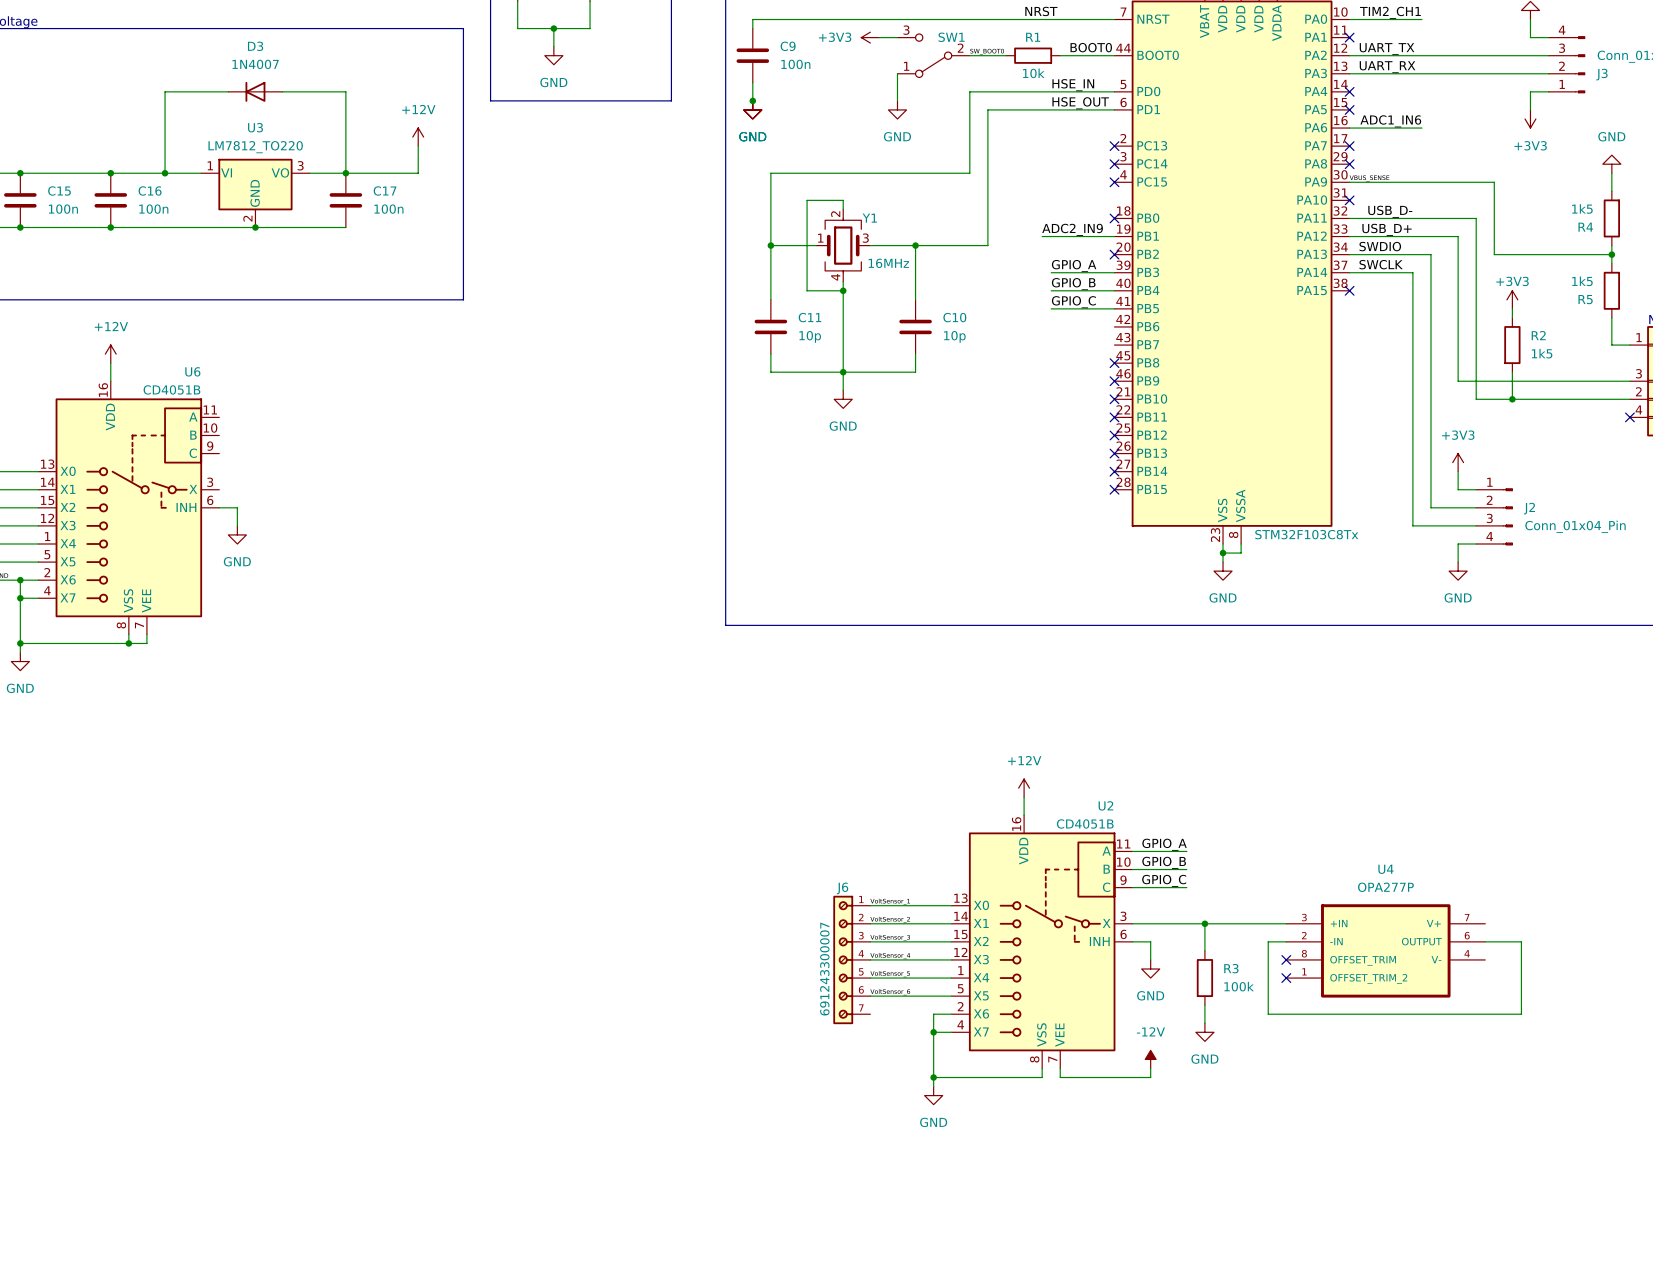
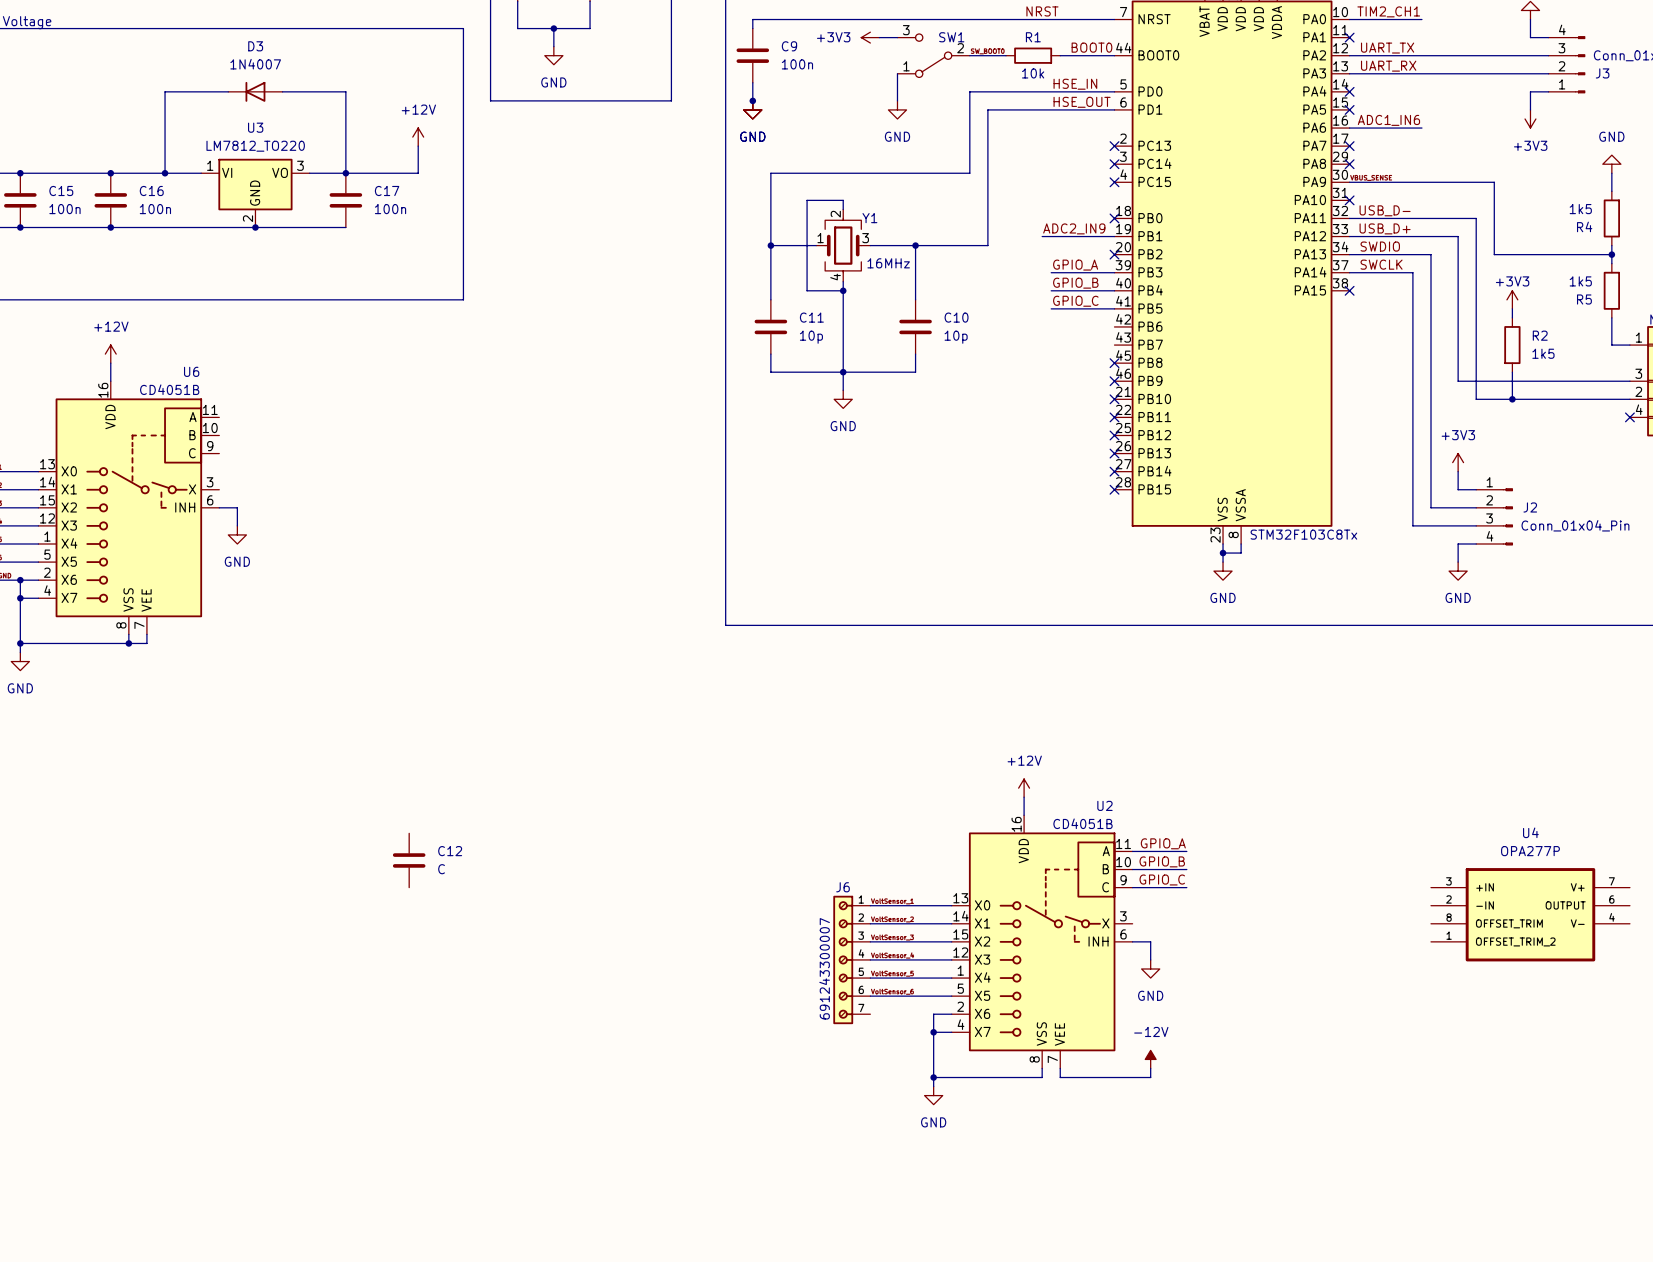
C12: none -> C (409, 860)
wire: (1132, 923) (1286, 923) -> none
wire: (1204, 923) (1204, 950) -> none
junction: (1204, 923) -> none
wire: (1286, 941) (1268, 941) (1268, 1014) (1521, 1014) (1521, 941) (1485, 941) -> none
U4 position: (1385, 950) -> (1530, 914)
no-connect mark: (1286, 959) -> none
R3: 100k (1204, 978) -> none
no-connect mark: (1286, 978) -> none
wire: (1204, 1005) (1204, 1023) -> none
power symbol: GND (1204, 1032) -> none

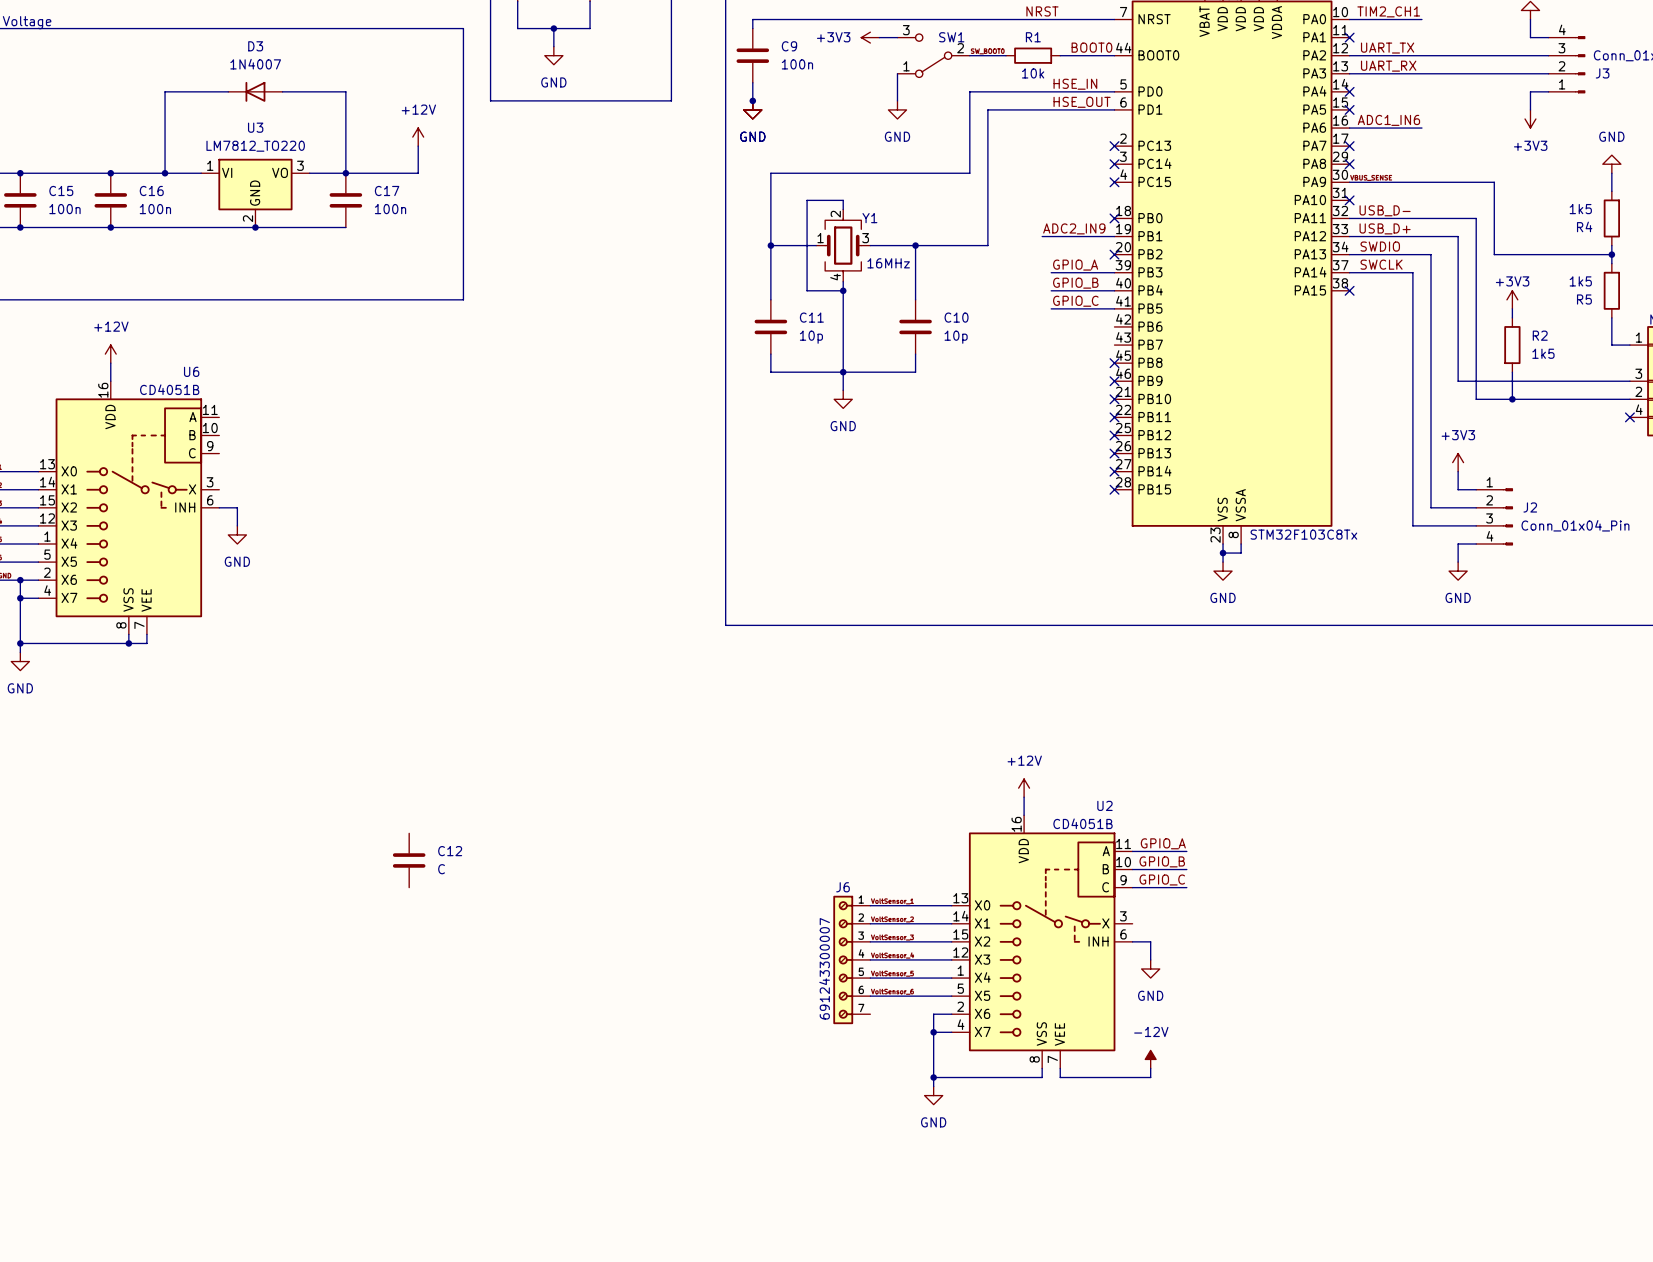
U4: OPA277P (1530, 914) -> none

